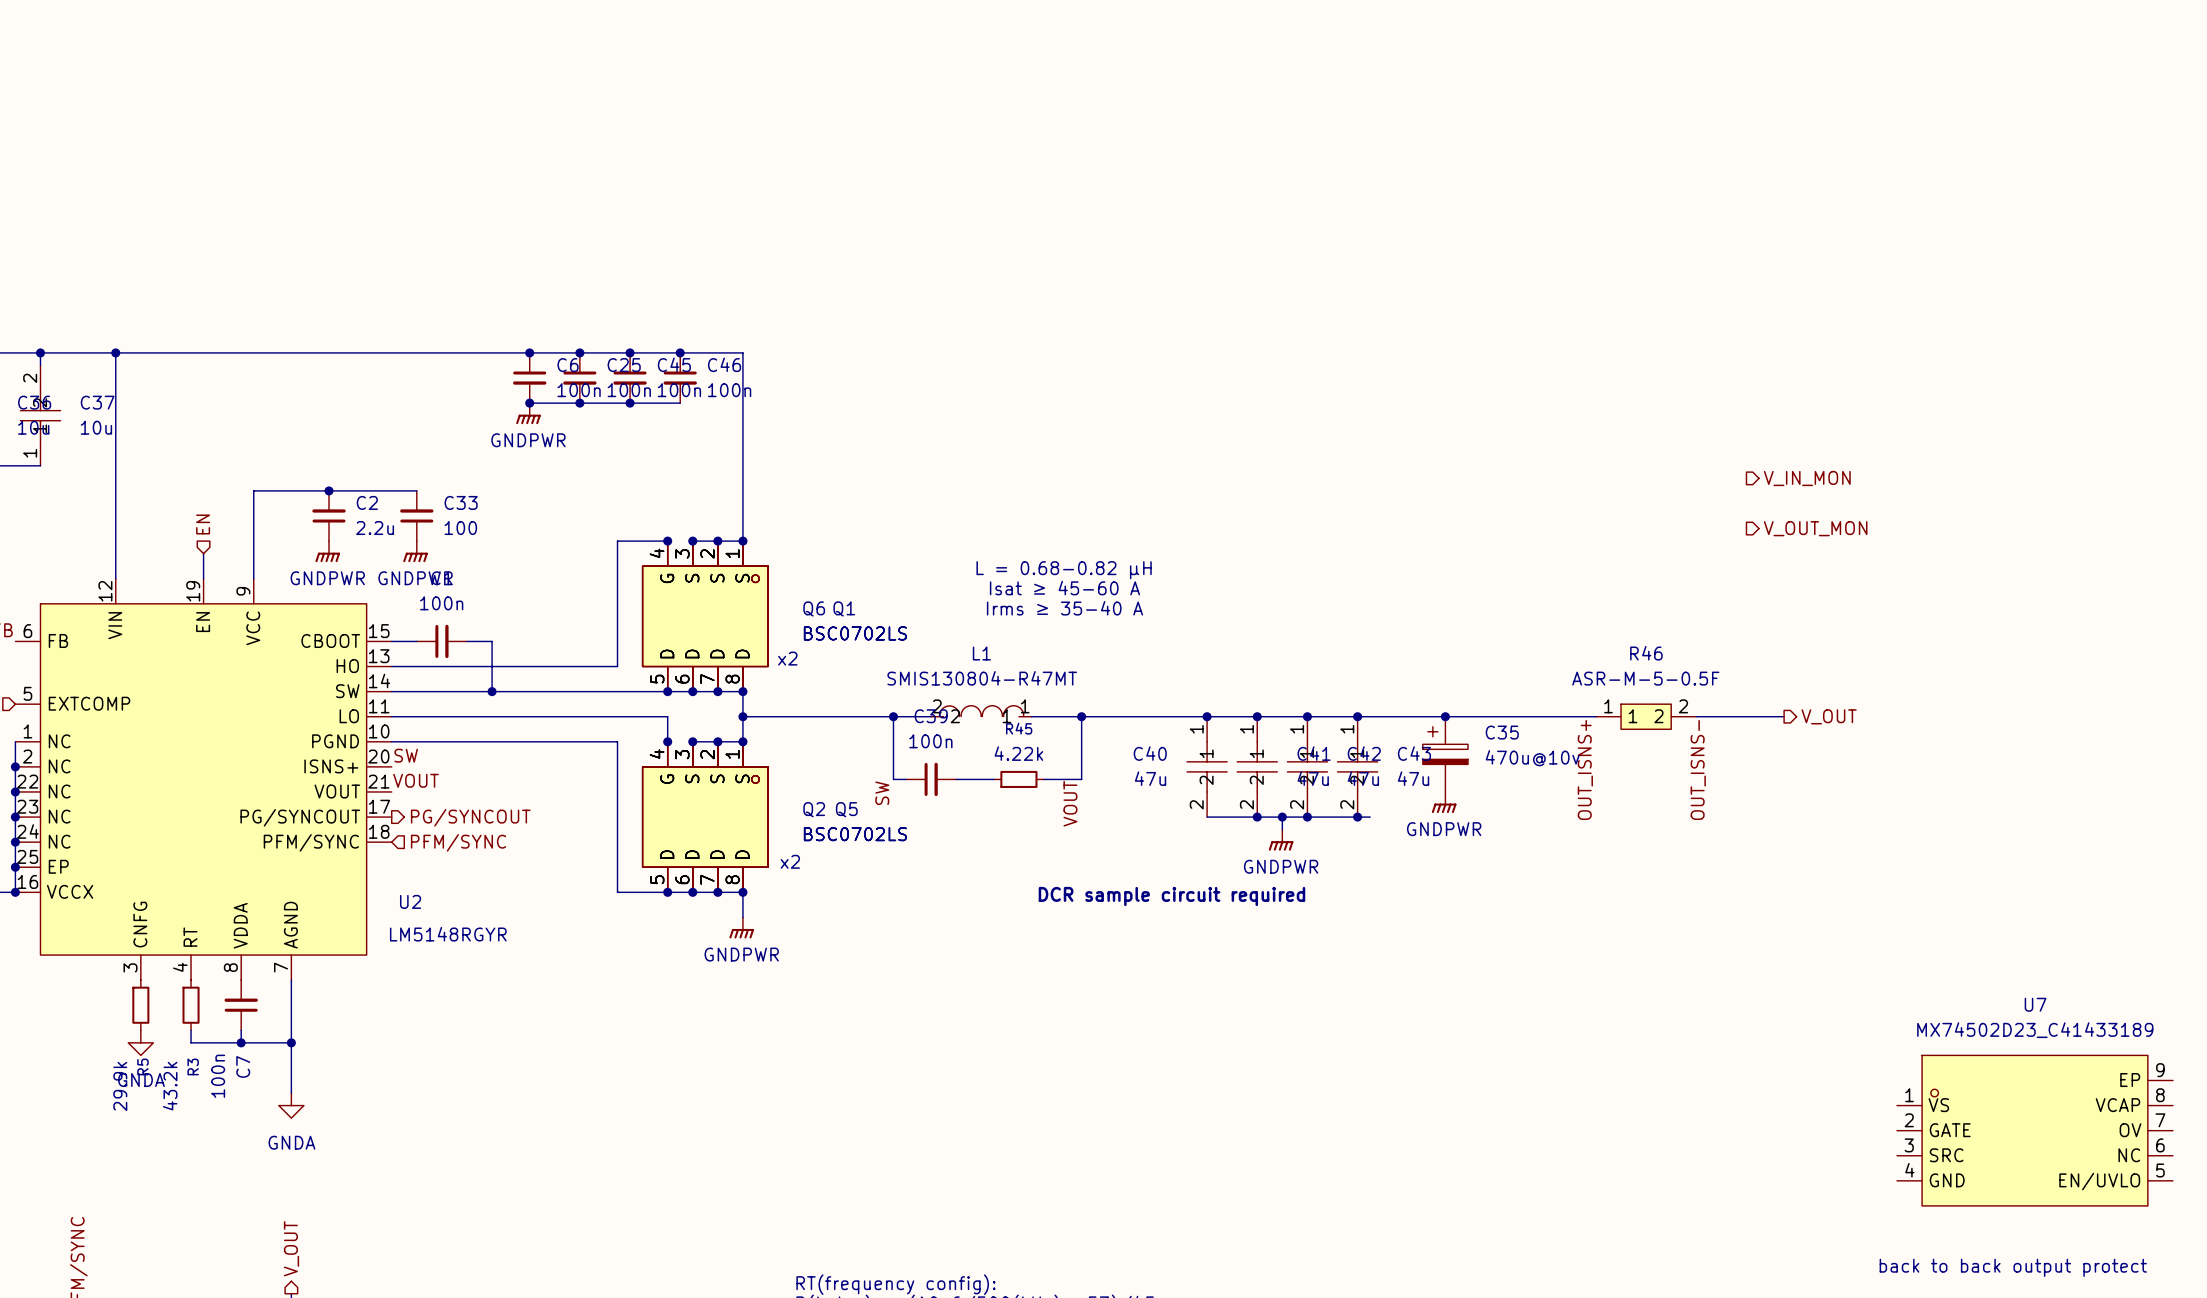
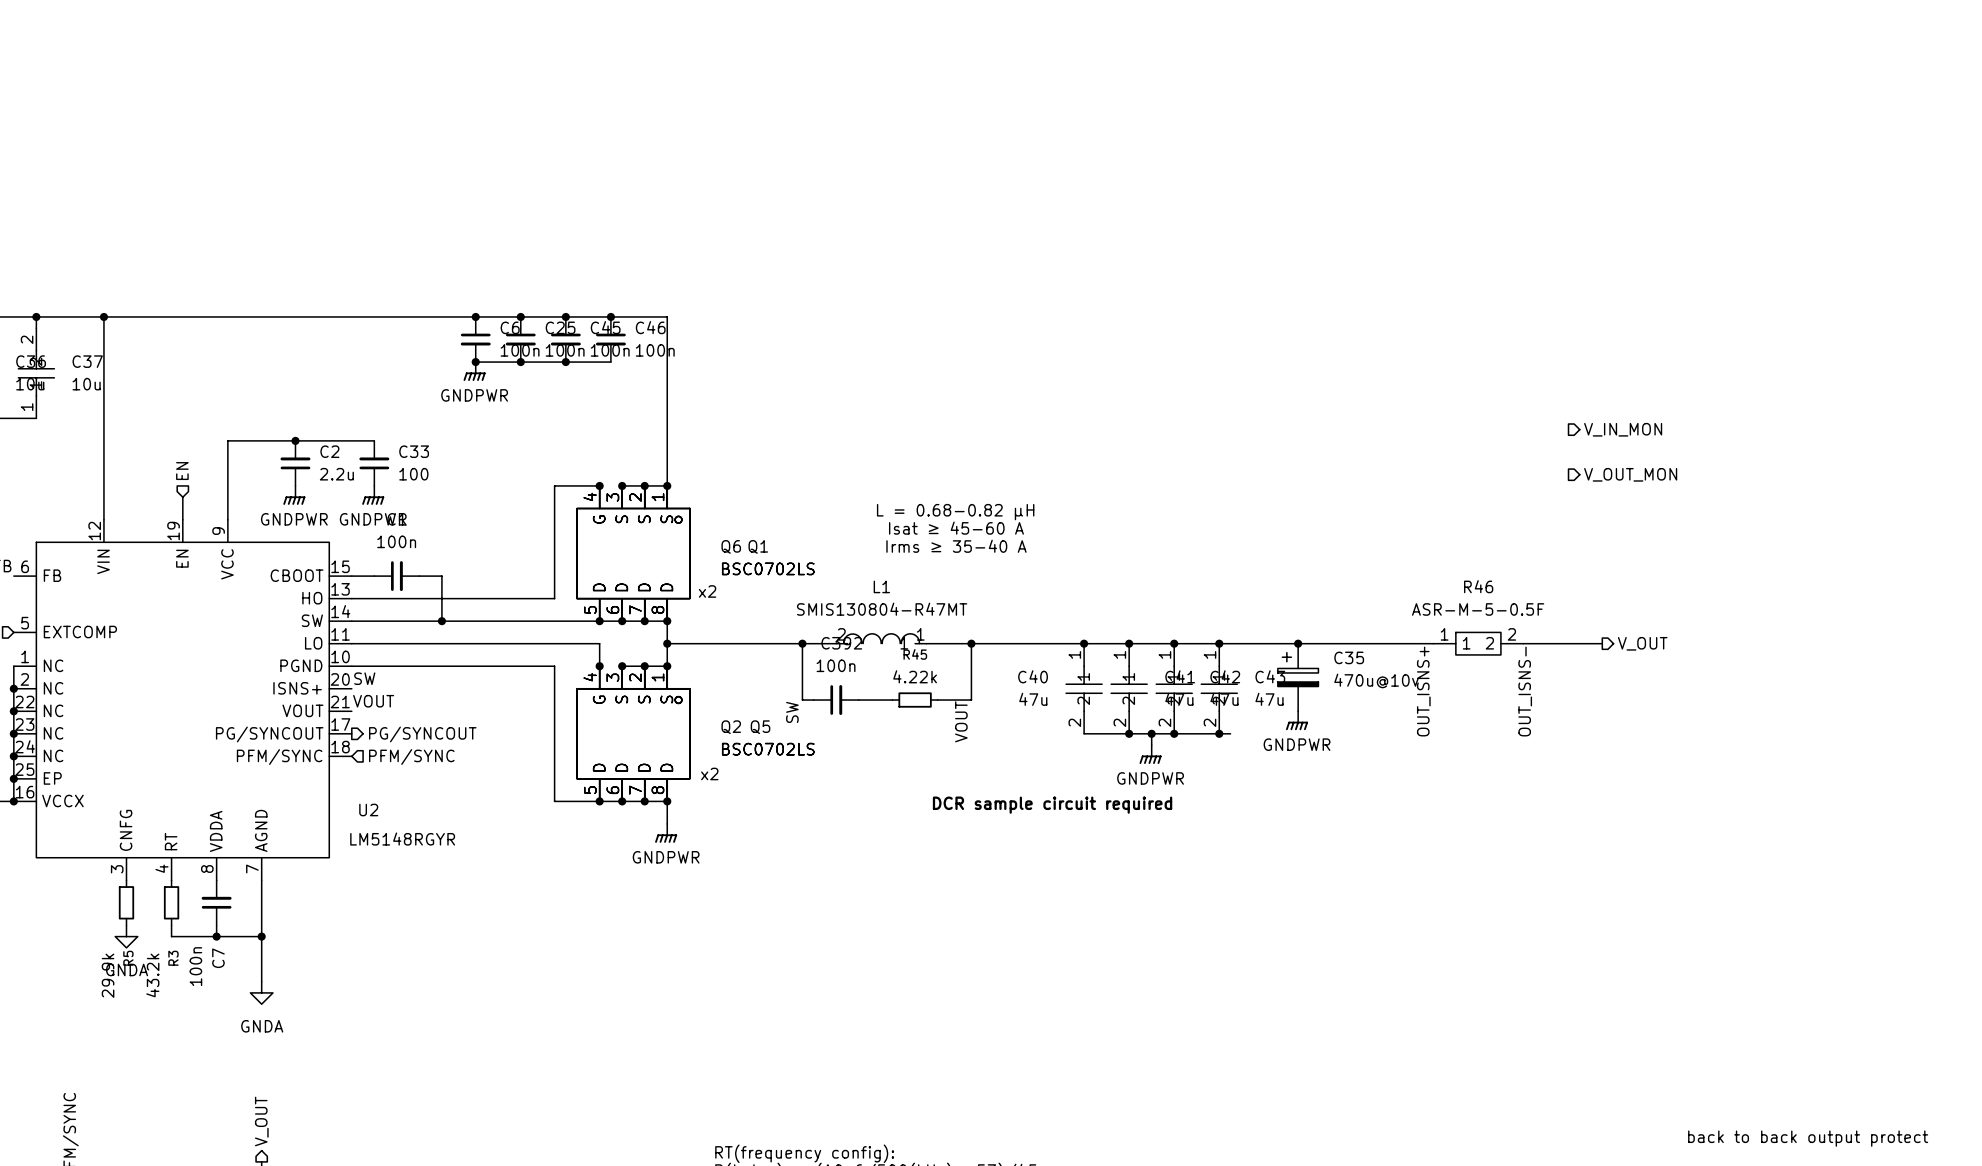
U7: MX74502D23_C41433189 (2034, 1130) -> none

